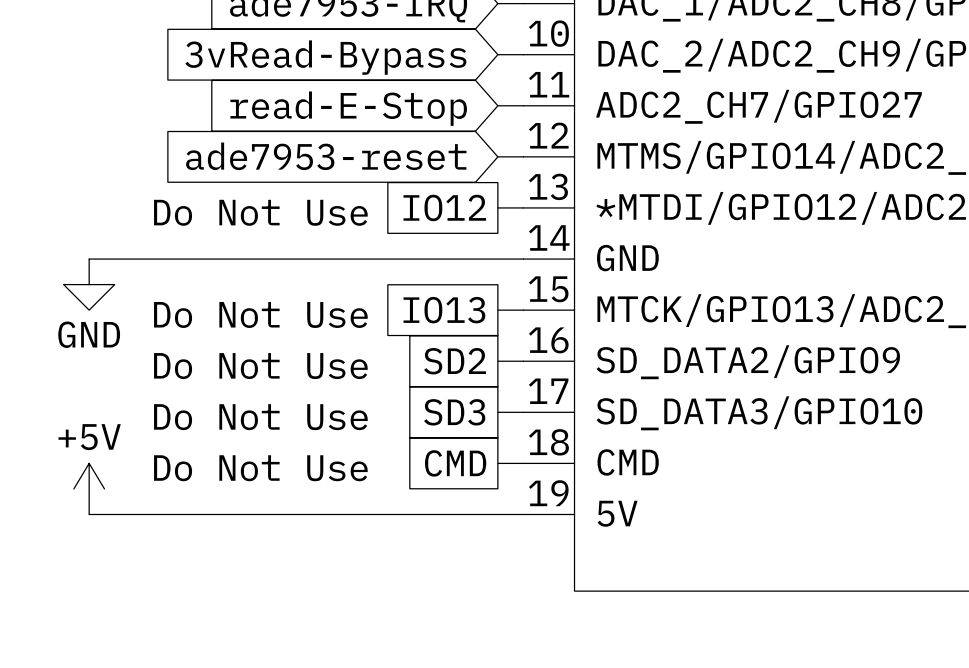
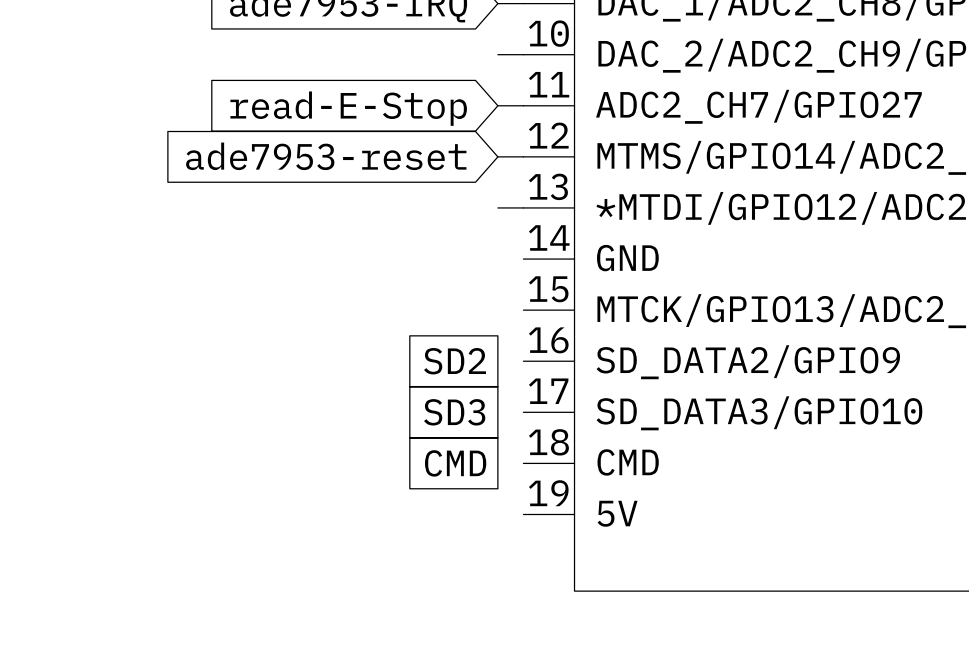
global label: 3vRead-Bypass (325, 57) -> none
global label: IO12 (444, 207) -> none
text: Do Not Use (260, 212) -> none
wire: (89, 259) (523, 259) -> none
power symbol: GND (89, 284) -> none
global label: IO13 (444, 310) -> none
wire: (497, 310) (523, 310) -> none
text: Do Not Use (260, 314) -> none
wire: (497, 361) (523, 361) -> none
text: Do Not Use (260, 366) -> none
wire: (497, 412) (523, 412) -> none
text: Do Not Use (260, 417) -> none
wire: (497, 463) (523, 463) -> none
text: Do Not Use (260, 468) -> none
power symbol: +5V (89, 488) -> none
wire: (89, 514) (523, 514) -> none

